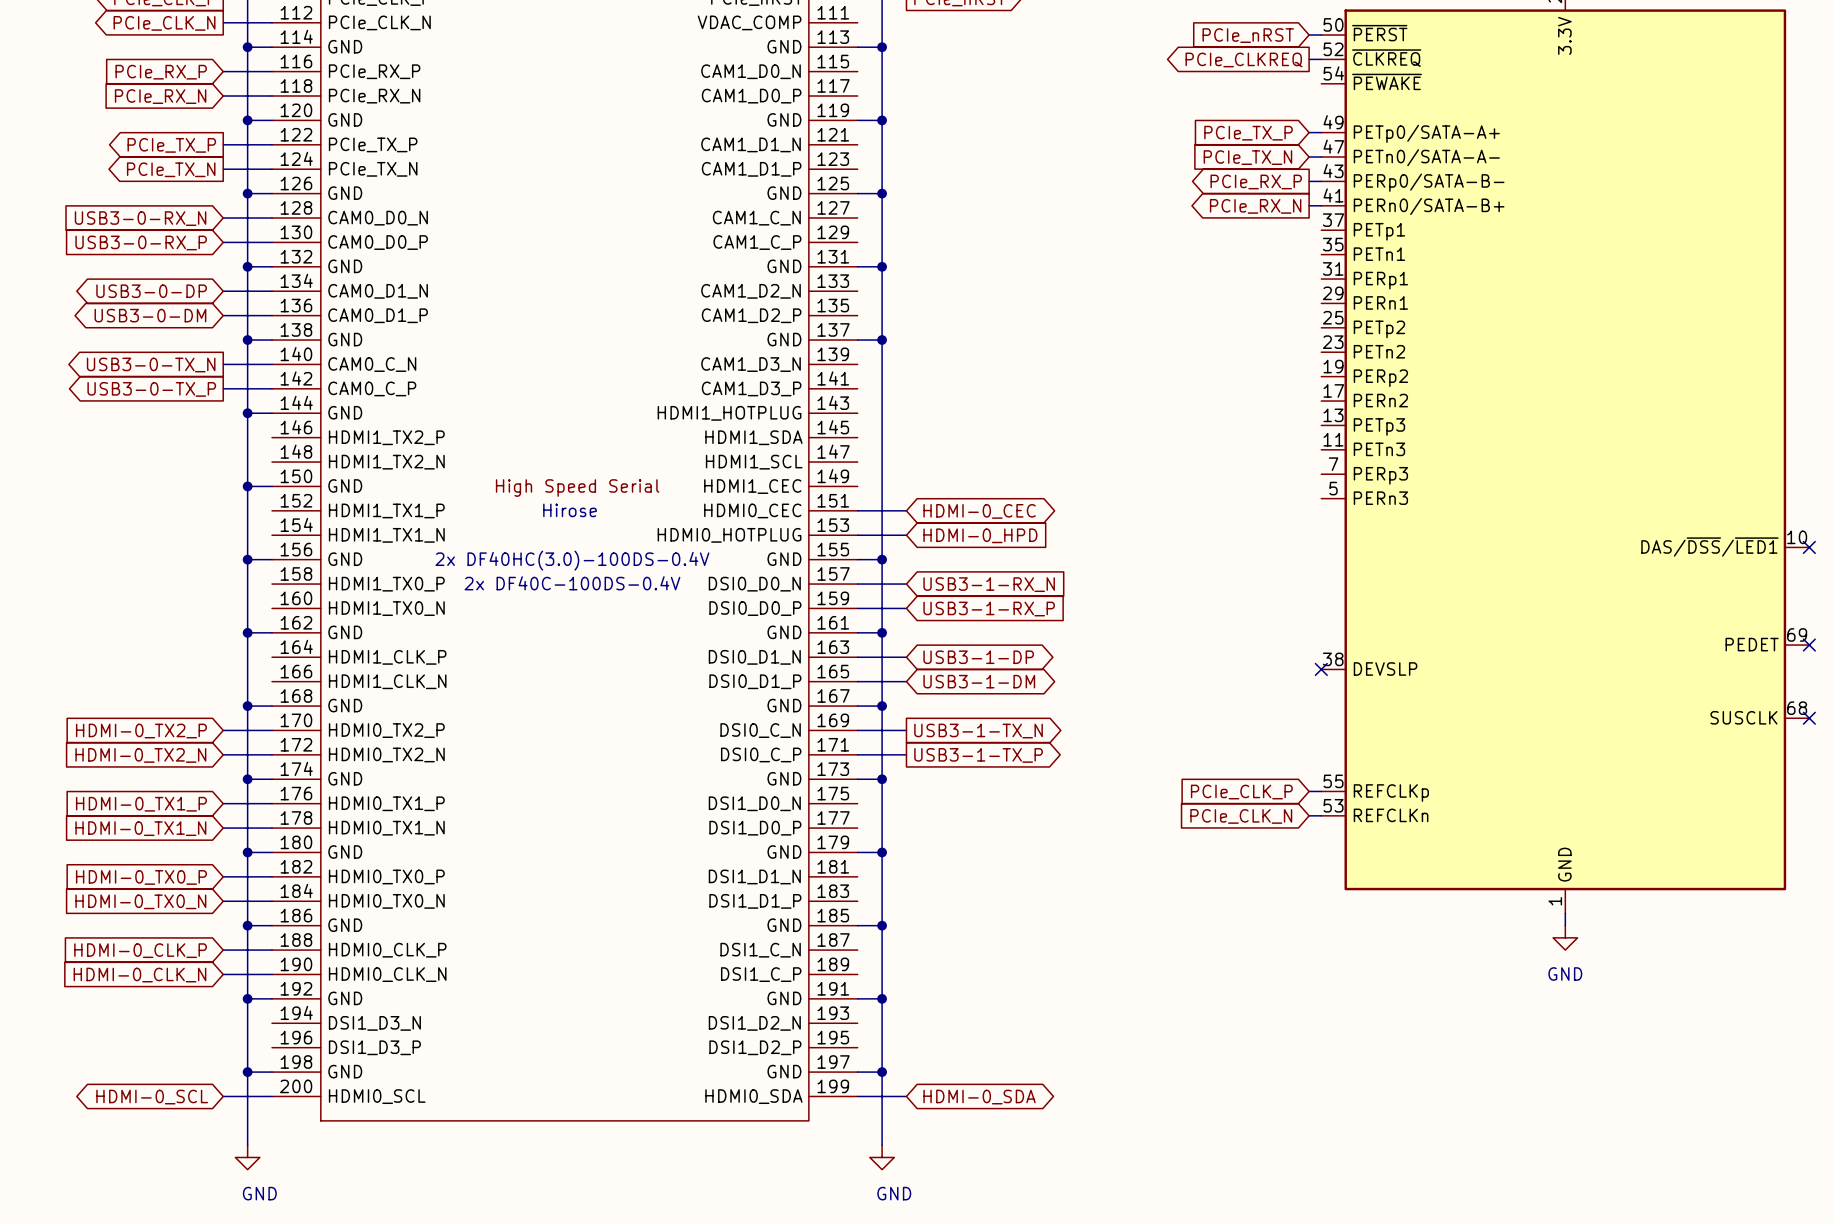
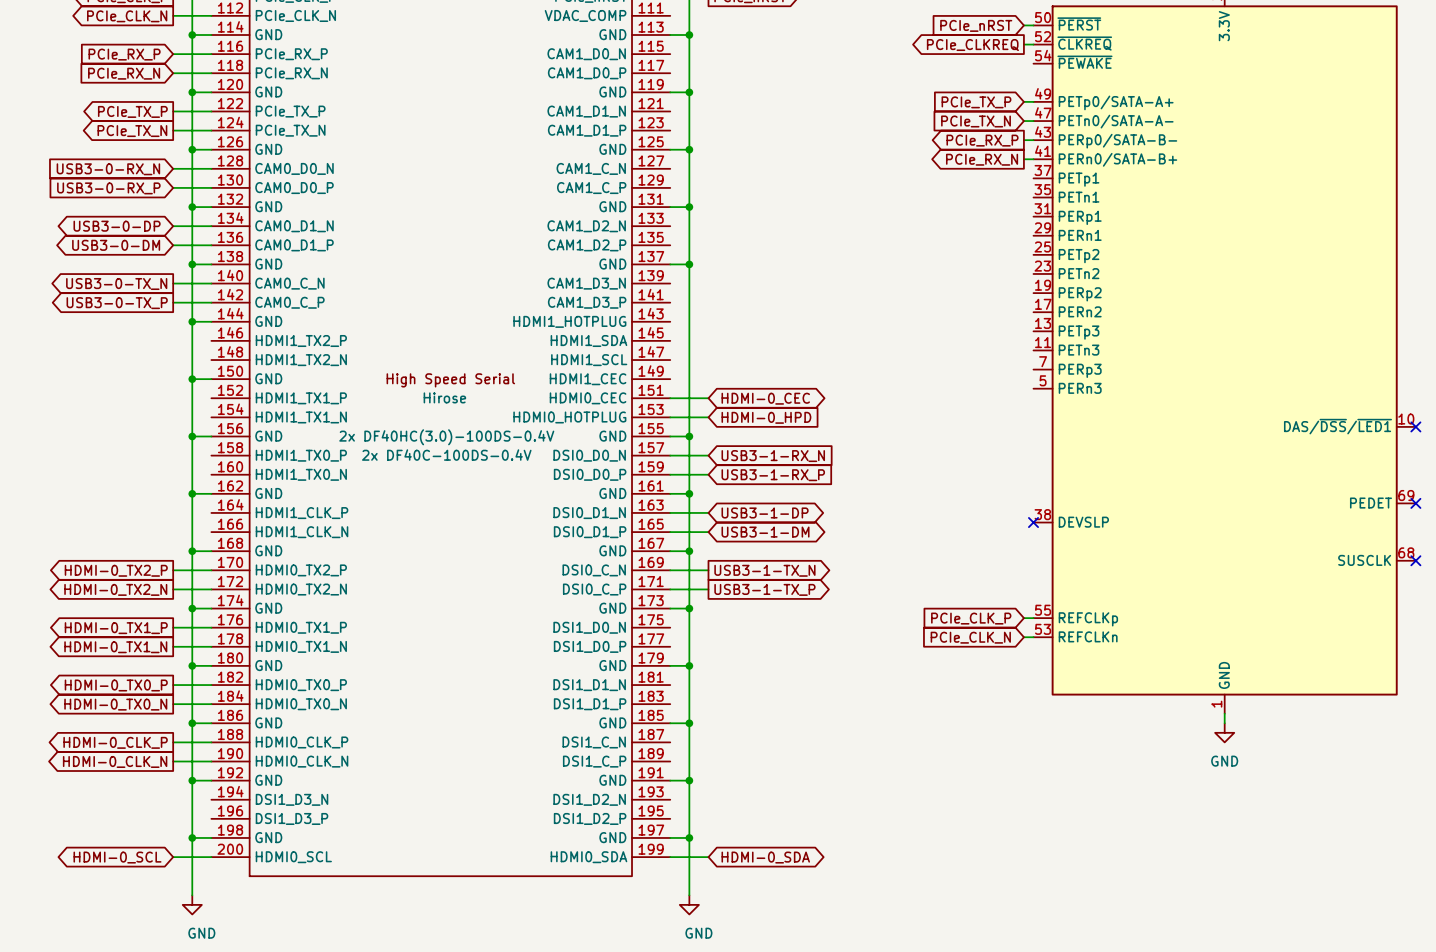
global label shape: input (141, 731) -> output (116, 570)
global label shape: input (140, 755) -> output (115, 589)
global label shape: input (141, 804) -> output (116, 628)
global label shape: input (140, 828) -> output (115, 647)
global label shape: input (141, 877) -> output (116, 685)
global label shape: input (140, 901) -> output (115, 704)
global label shape: input (140, 950) -> output (115, 742)
global label shape: input (139, 975) -> output (115, 761)

